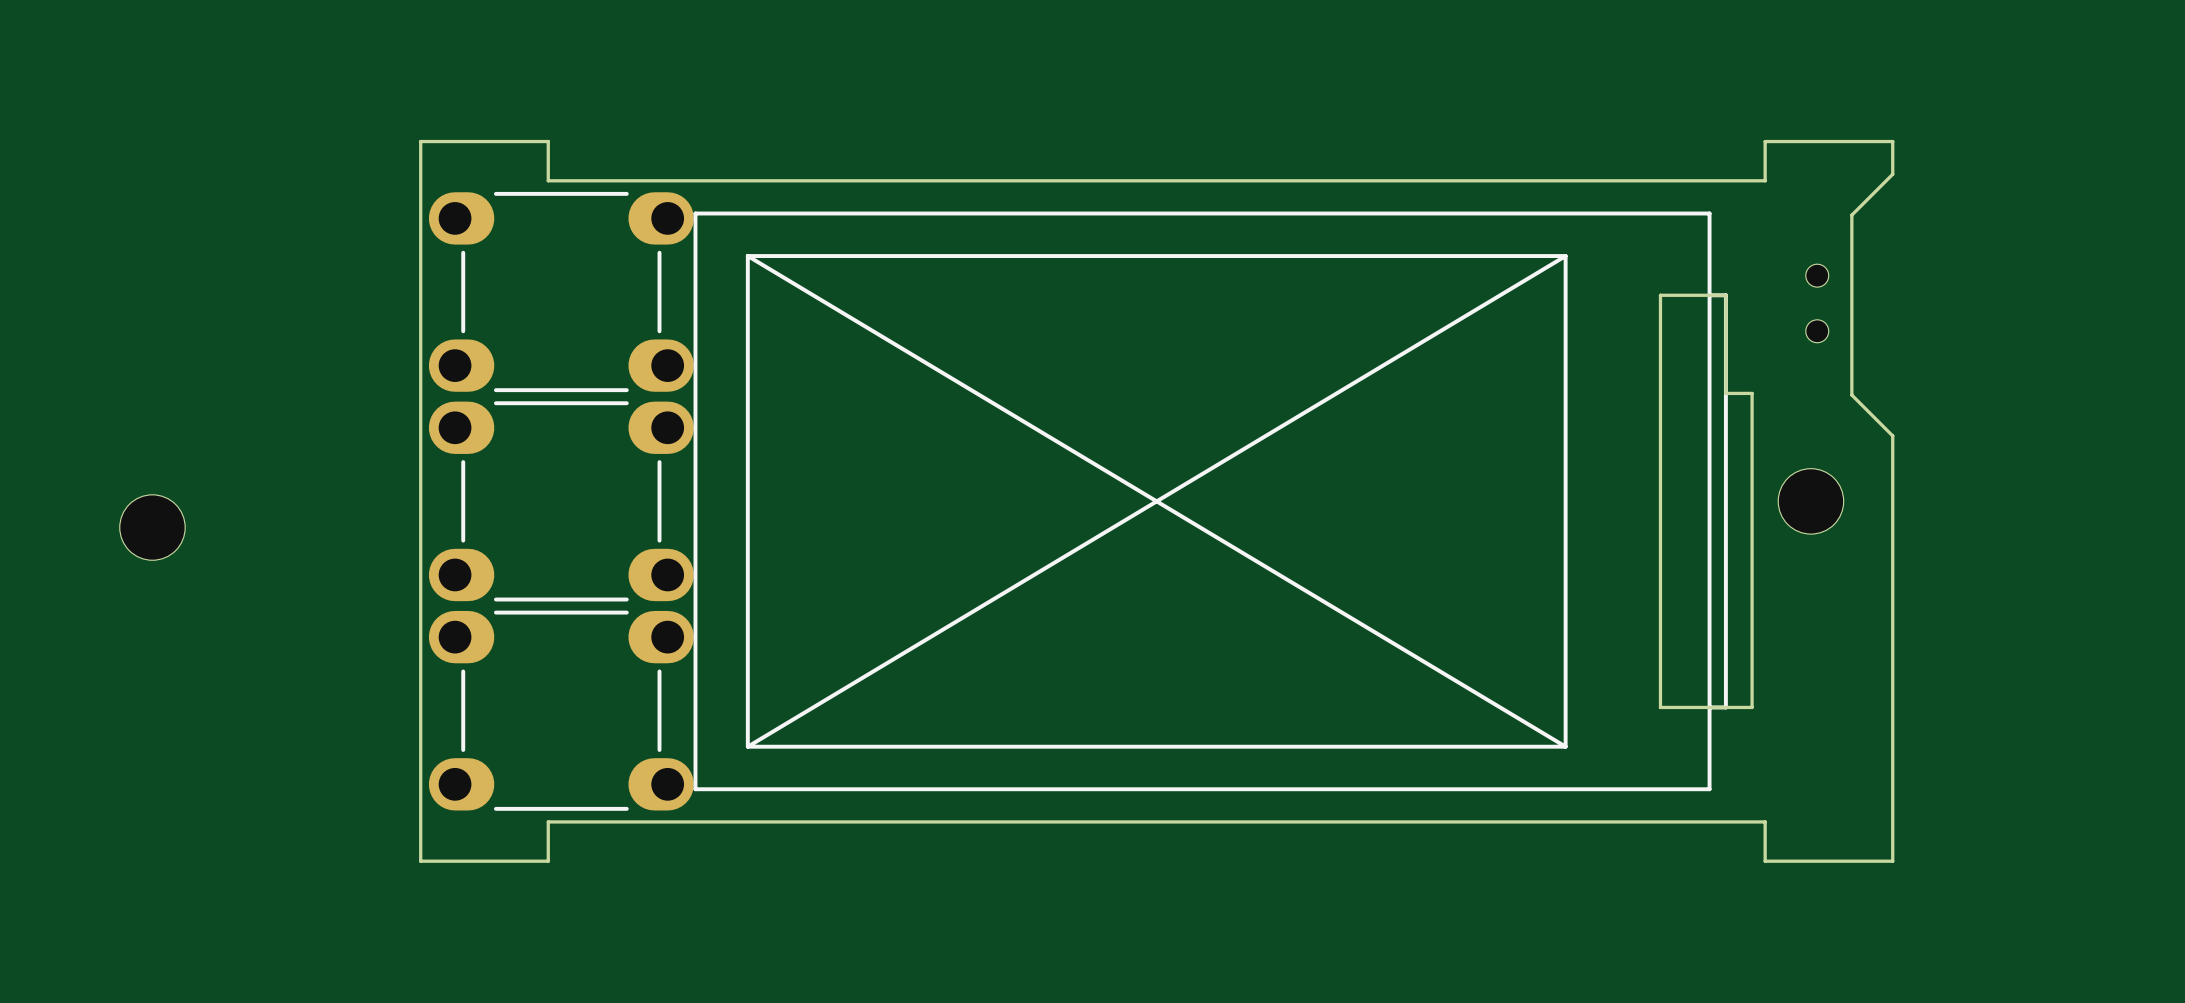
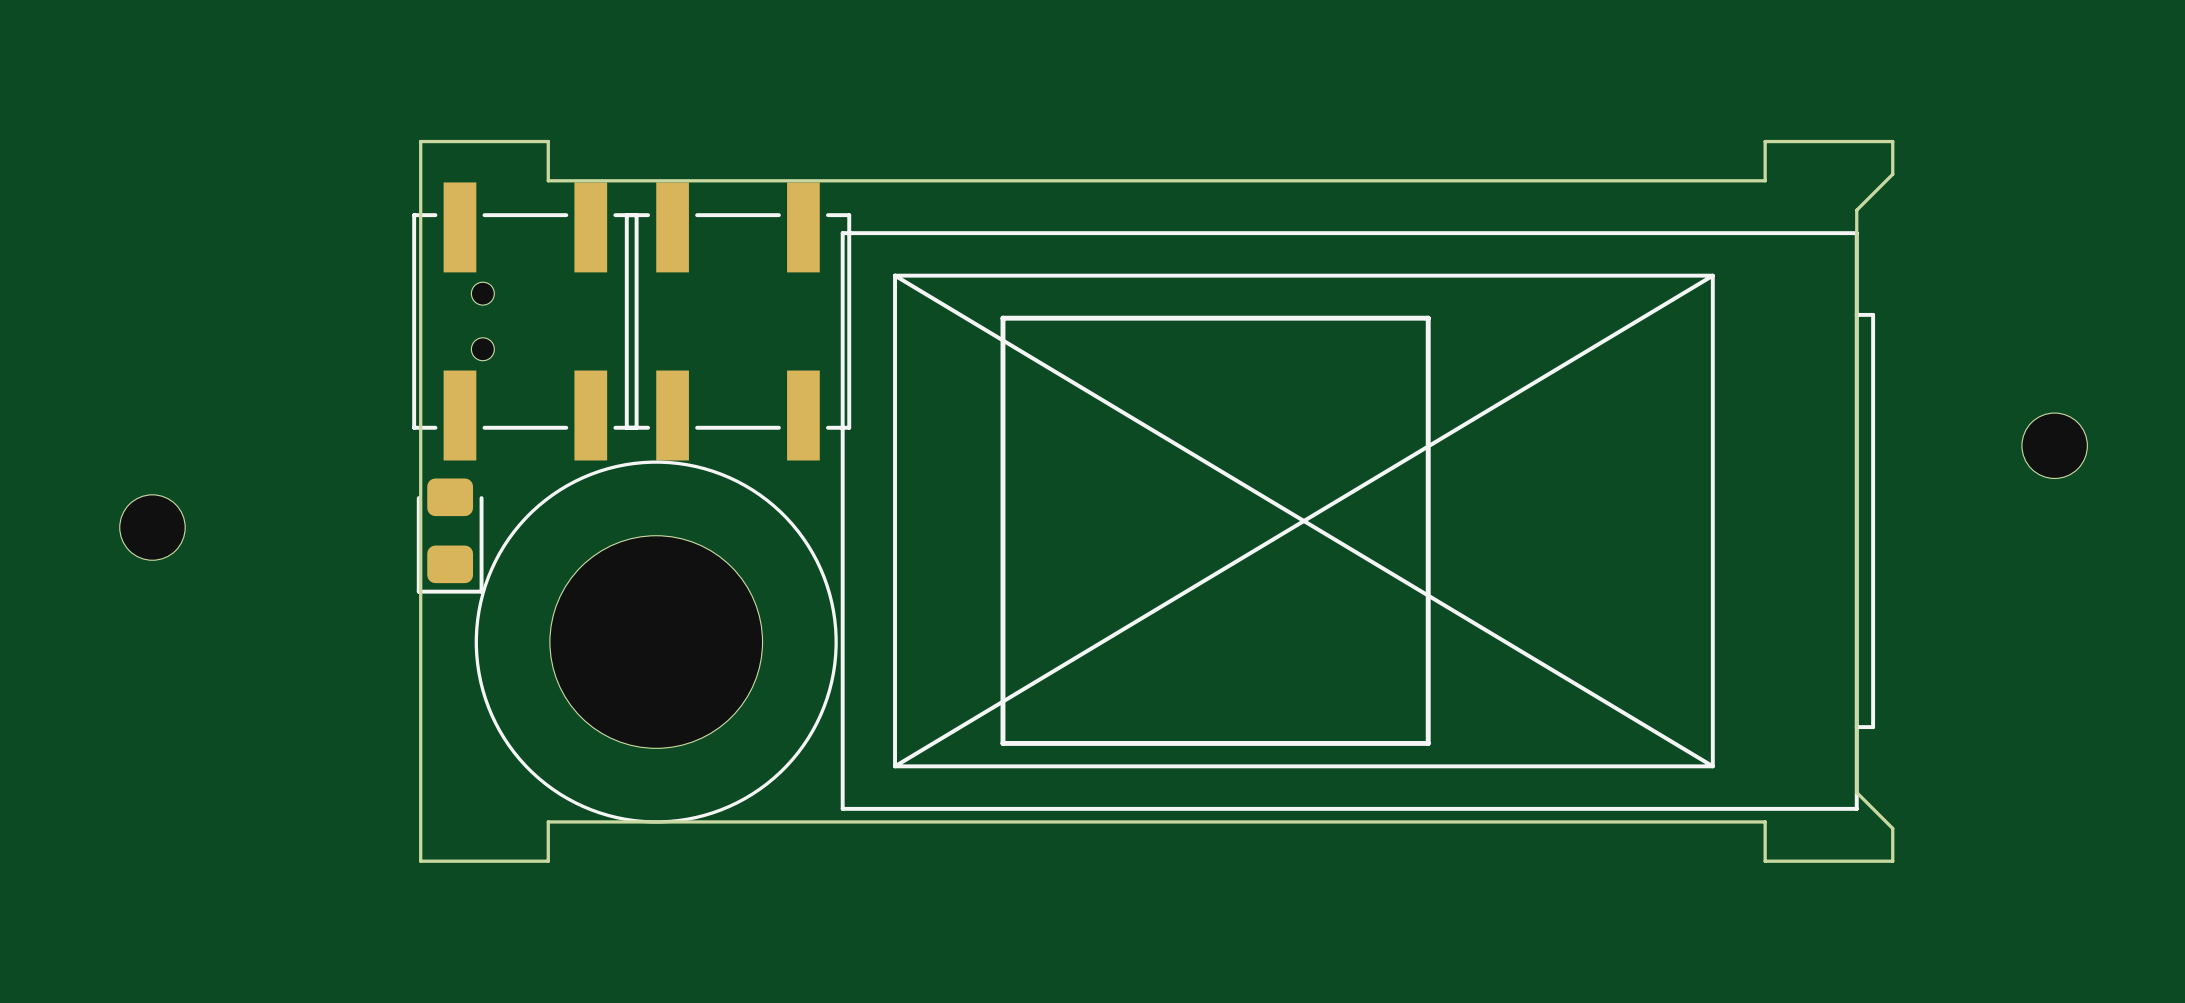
board edge: (1856, 210) (1851, 215) (1851, 395) (1892, 435) (1892, 828) -> (1856, 210) (1856, 792) (1892, 828)
part: (561, 292) -> none
board edge: (1660, 295) (1725, 295) (1725, 393) (1752, 393) (1752, 707) (1660, 707) (1660, 295) -> none
part: (1817, 303) -> none
line: none -> (1002, 318) (1428, 318) (1428, 743) (1002, 743) (1002, 318)
part: none -> (482, 321)
part: none -> (525, 321)
part: none -> (738, 321)
part: (561, 501) -> none
part position: (1210, 501) -> (1357, 521)
part position: (1810, 501) -> (2054, 445)
part: none -> (450, 536)
part: none -> (656, 642)
part: (561, 710) -> none

